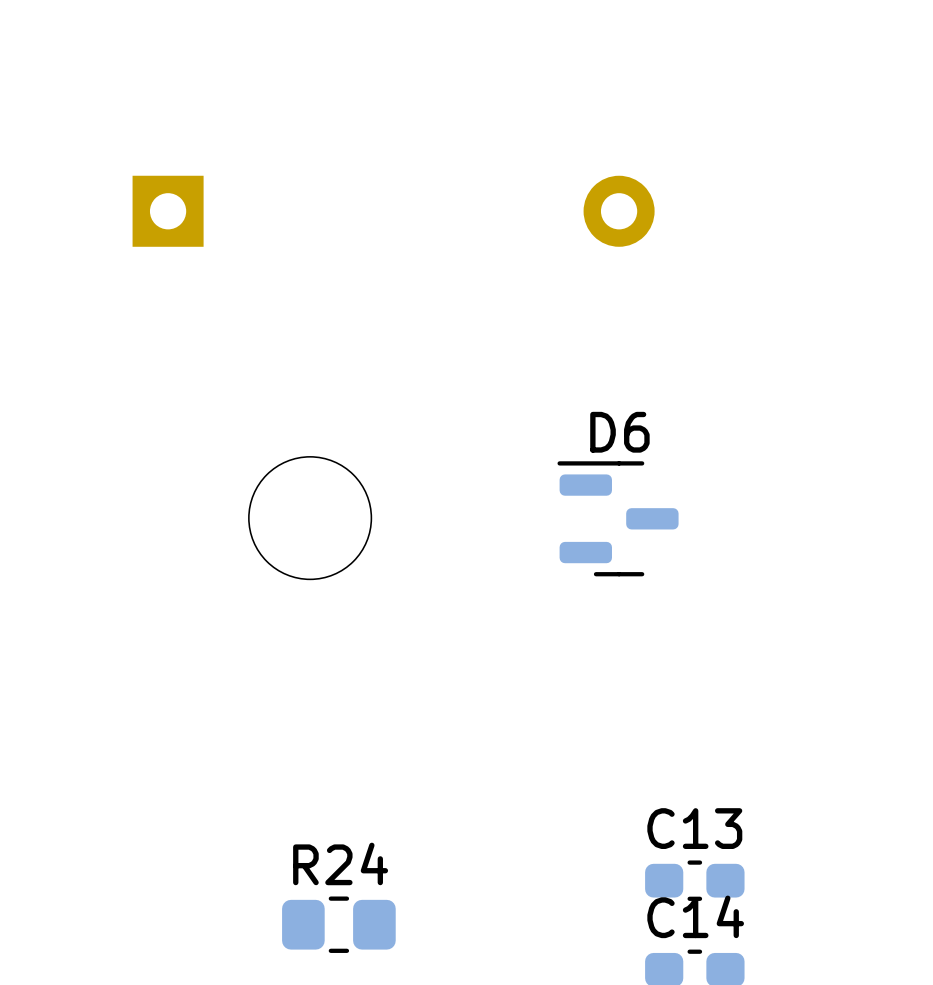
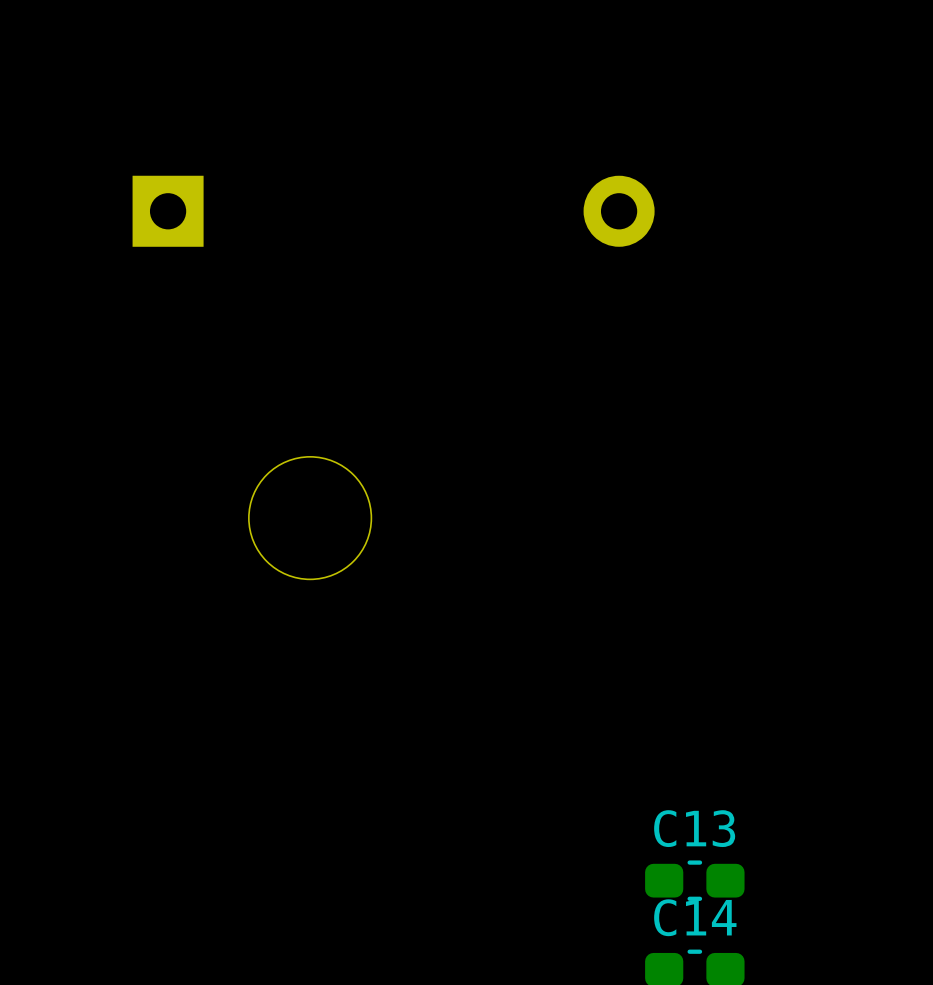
D6: (618, 518) -> none
R24: (338, 924) -> none

